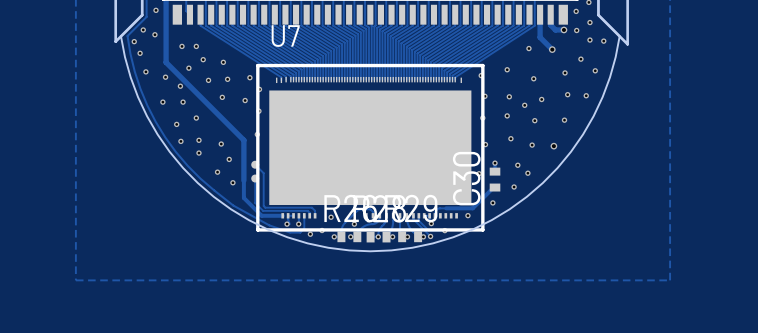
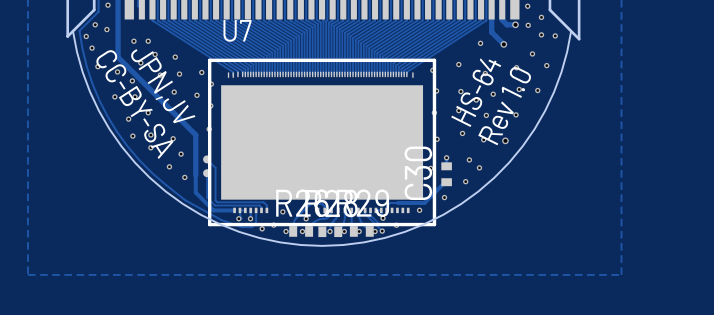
text: none -> JPN,JV (163, 86)
text: none -> HS-64 (476, 92)
text: none -> CC-BY-SA (134, 104)
text: none -> Rev 1.0 (504, 105)

